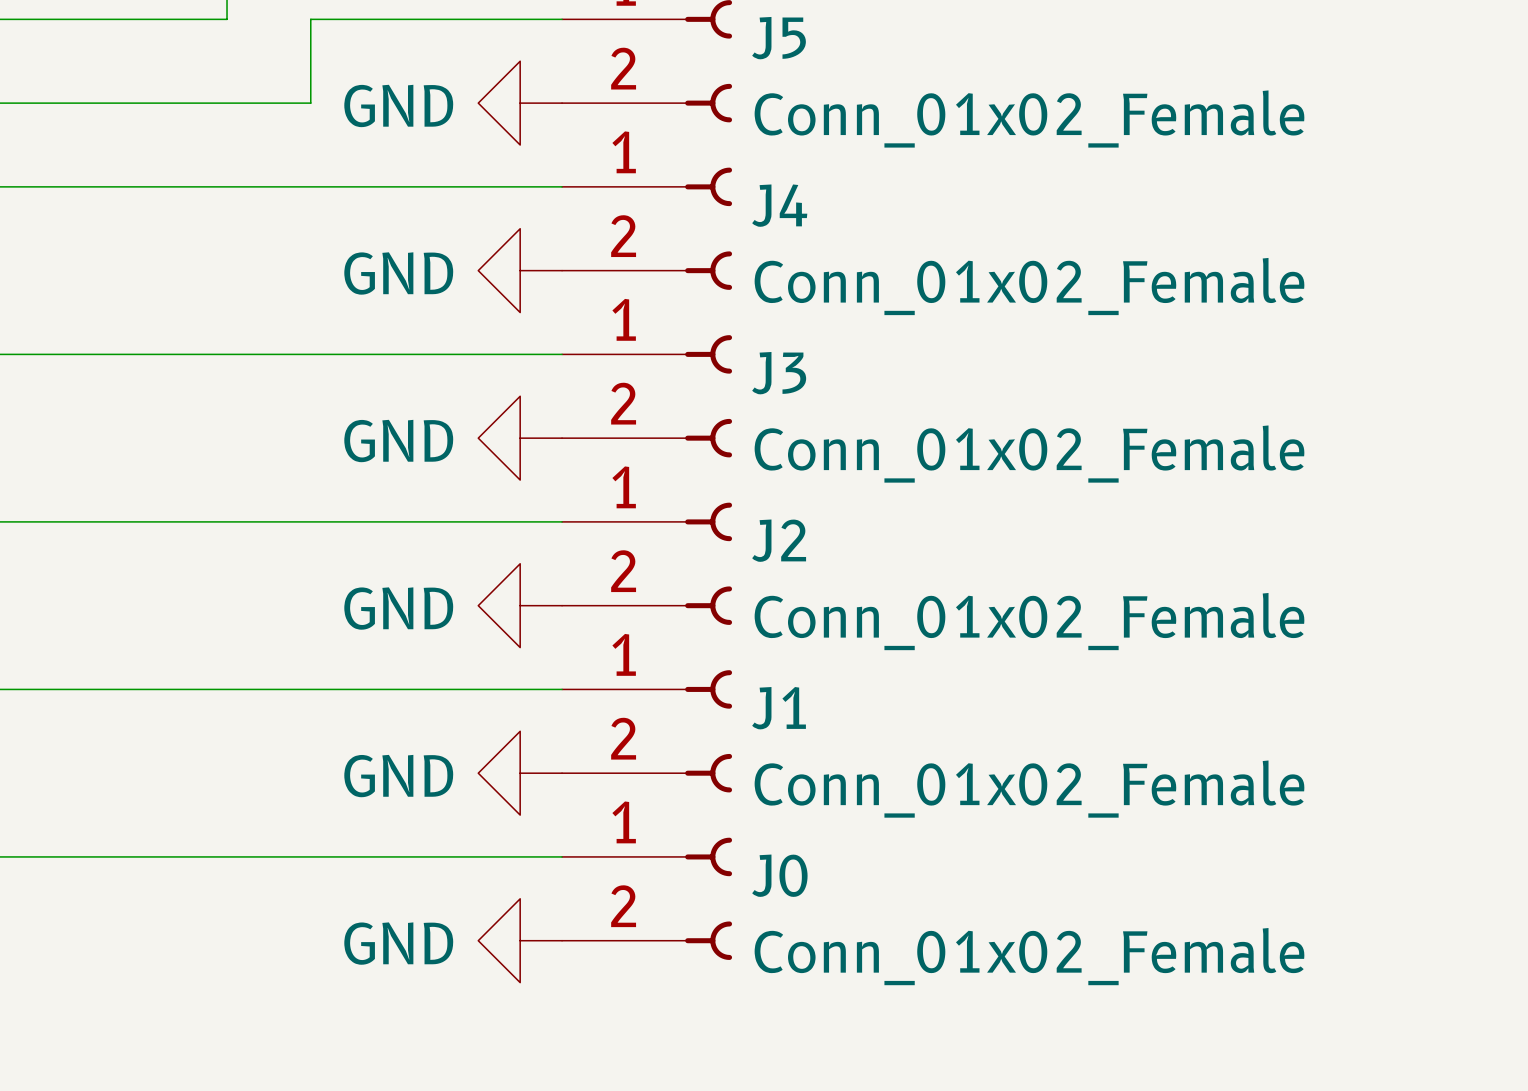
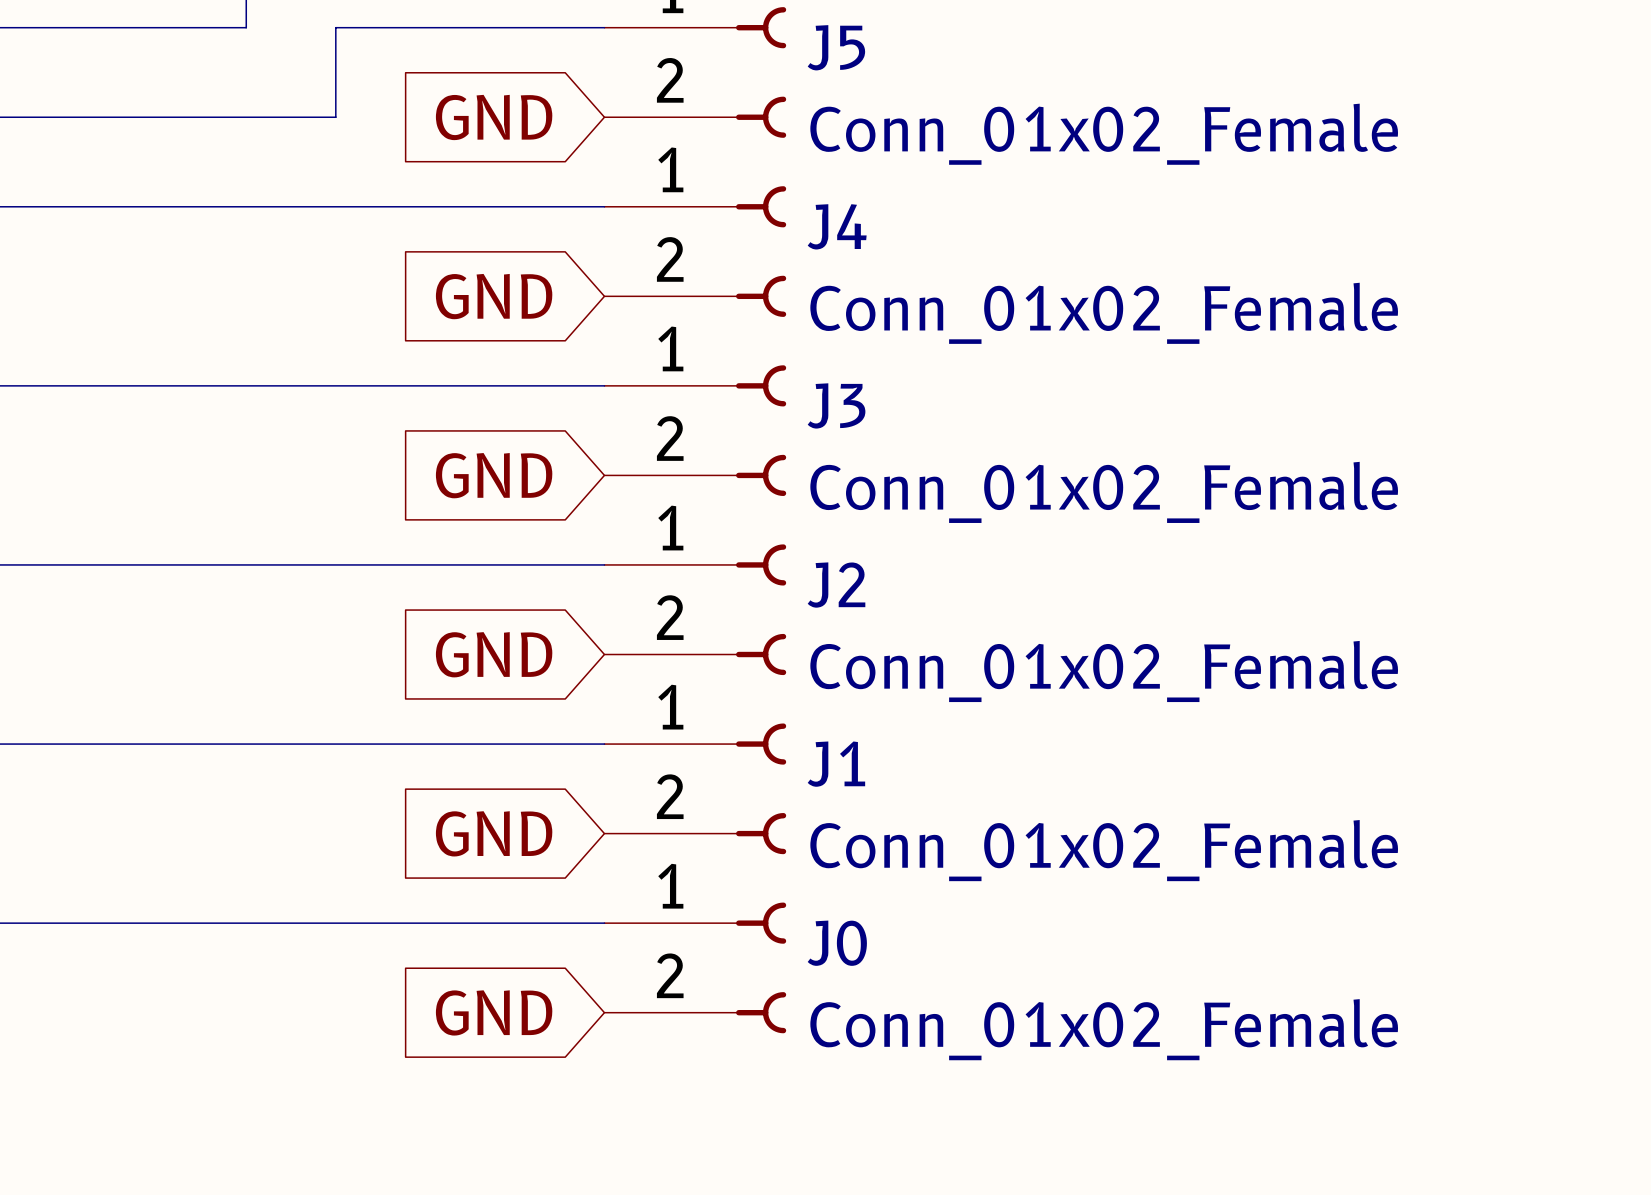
global label: none -> GND (494, 117)
power symbol: GND (520, 103) -> none
global label: none -> GND (494, 296)
power symbol: GND (520, 270) -> none
global label: none -> GND (494, 475)
power symbol: GND (520, 438) -> none
global label: none -> GND (494, 654)
power symbol: GND (520, 605) -> none
global label: none -> GND (494, 833)
power symbol: GND (520, 773) -> none
global label: none -> GND (494, 1012)
power symbol: GND (520, 940) -> none

